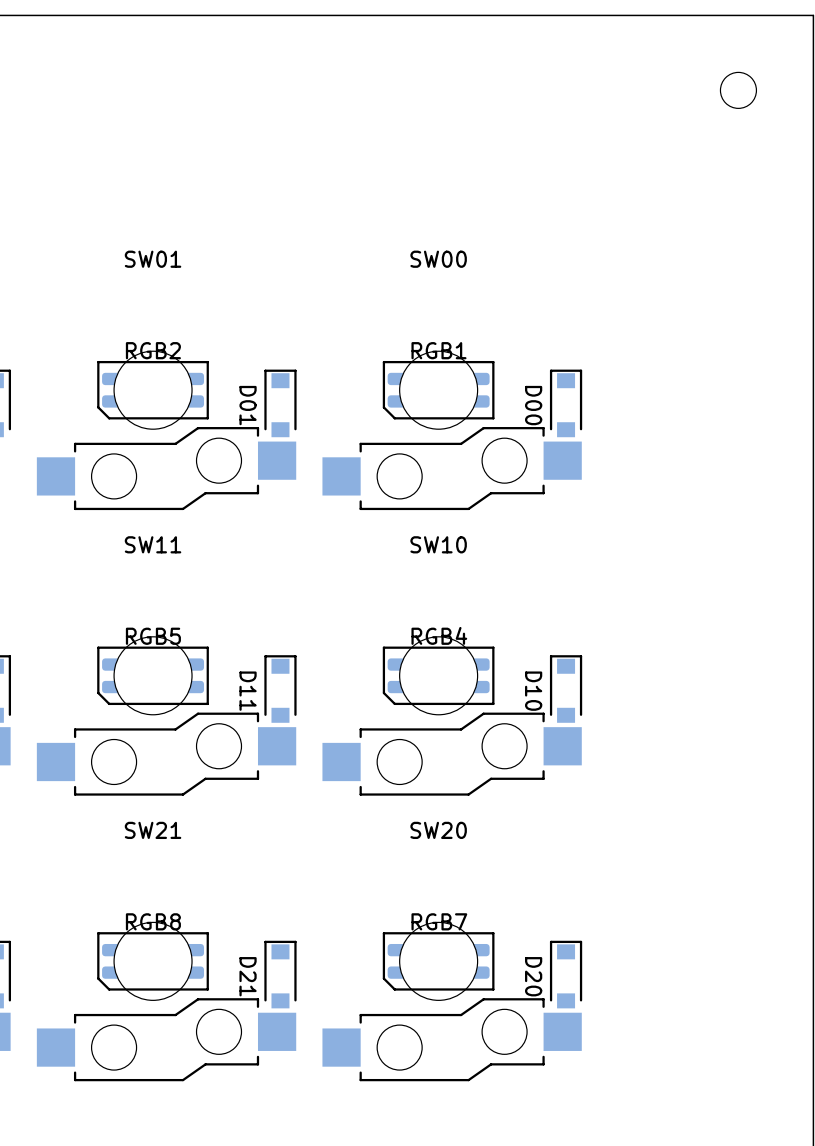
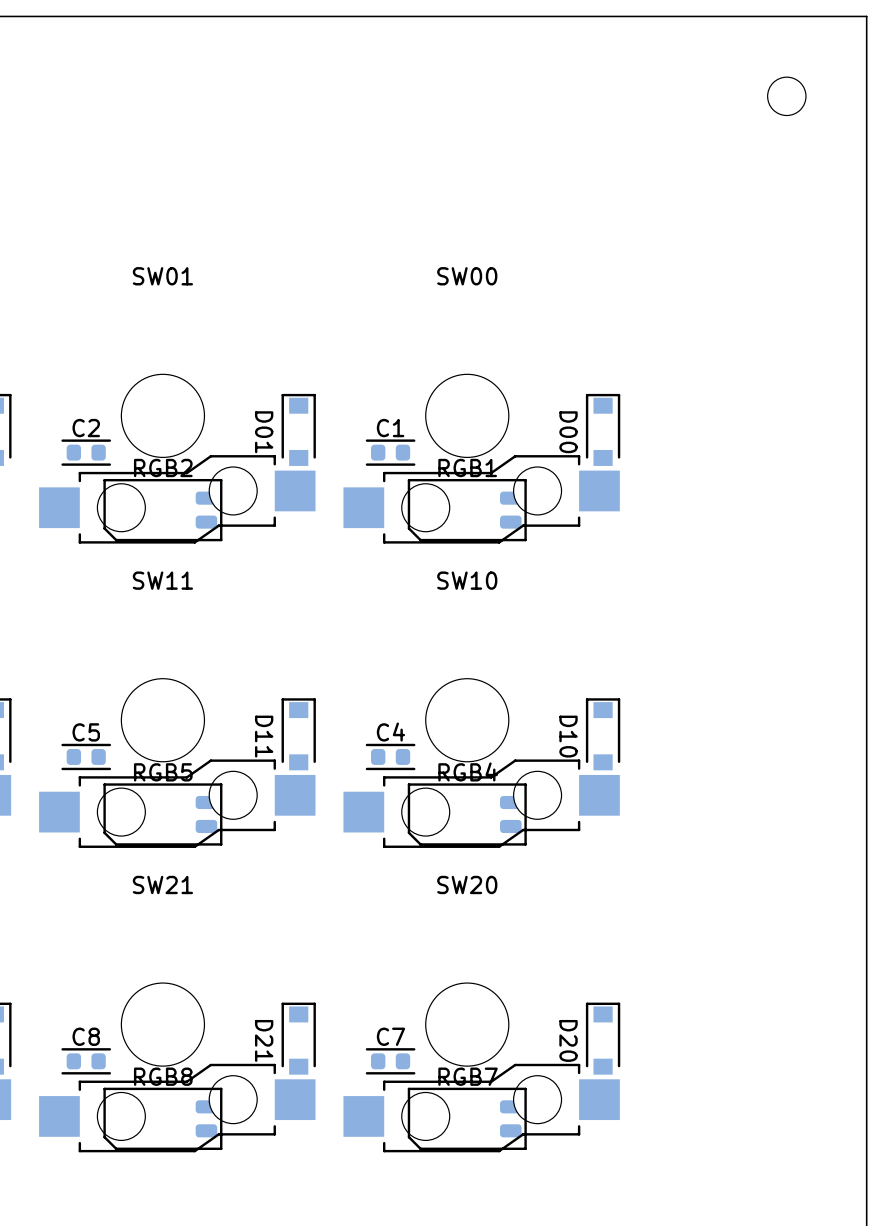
RGB2 position: (153, 390) -> (162, 510)
RGB1 position: (438, 390) -> (467, 510)
C2: none -> (86, 452)
C1: none -> (390, 452)
RGB5 position: (153, 675) -> (162, 814)
RGB4 position: (438, 675) -> (467, 814)
C5: none -> (86, 756)
C4: none -> (390, 756)
RGB8 position: (153, 961) -> (162, 1118)
RGB7 position: (438, 961) -> (467, 1118)
C8: none -> (86, 1061)
C7: none -> (390, 1061)

